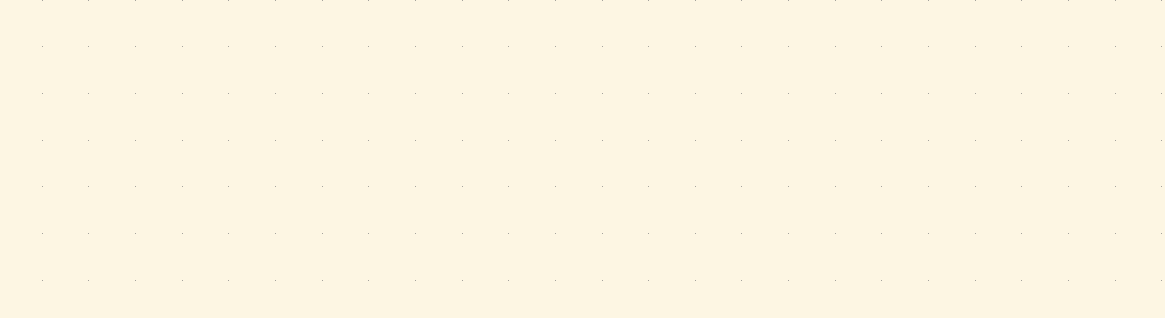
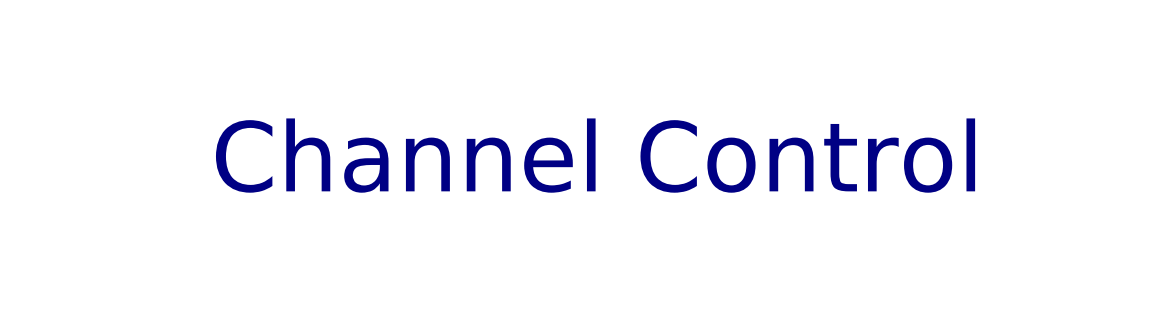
text: none -> Channel Control (595, 155)

